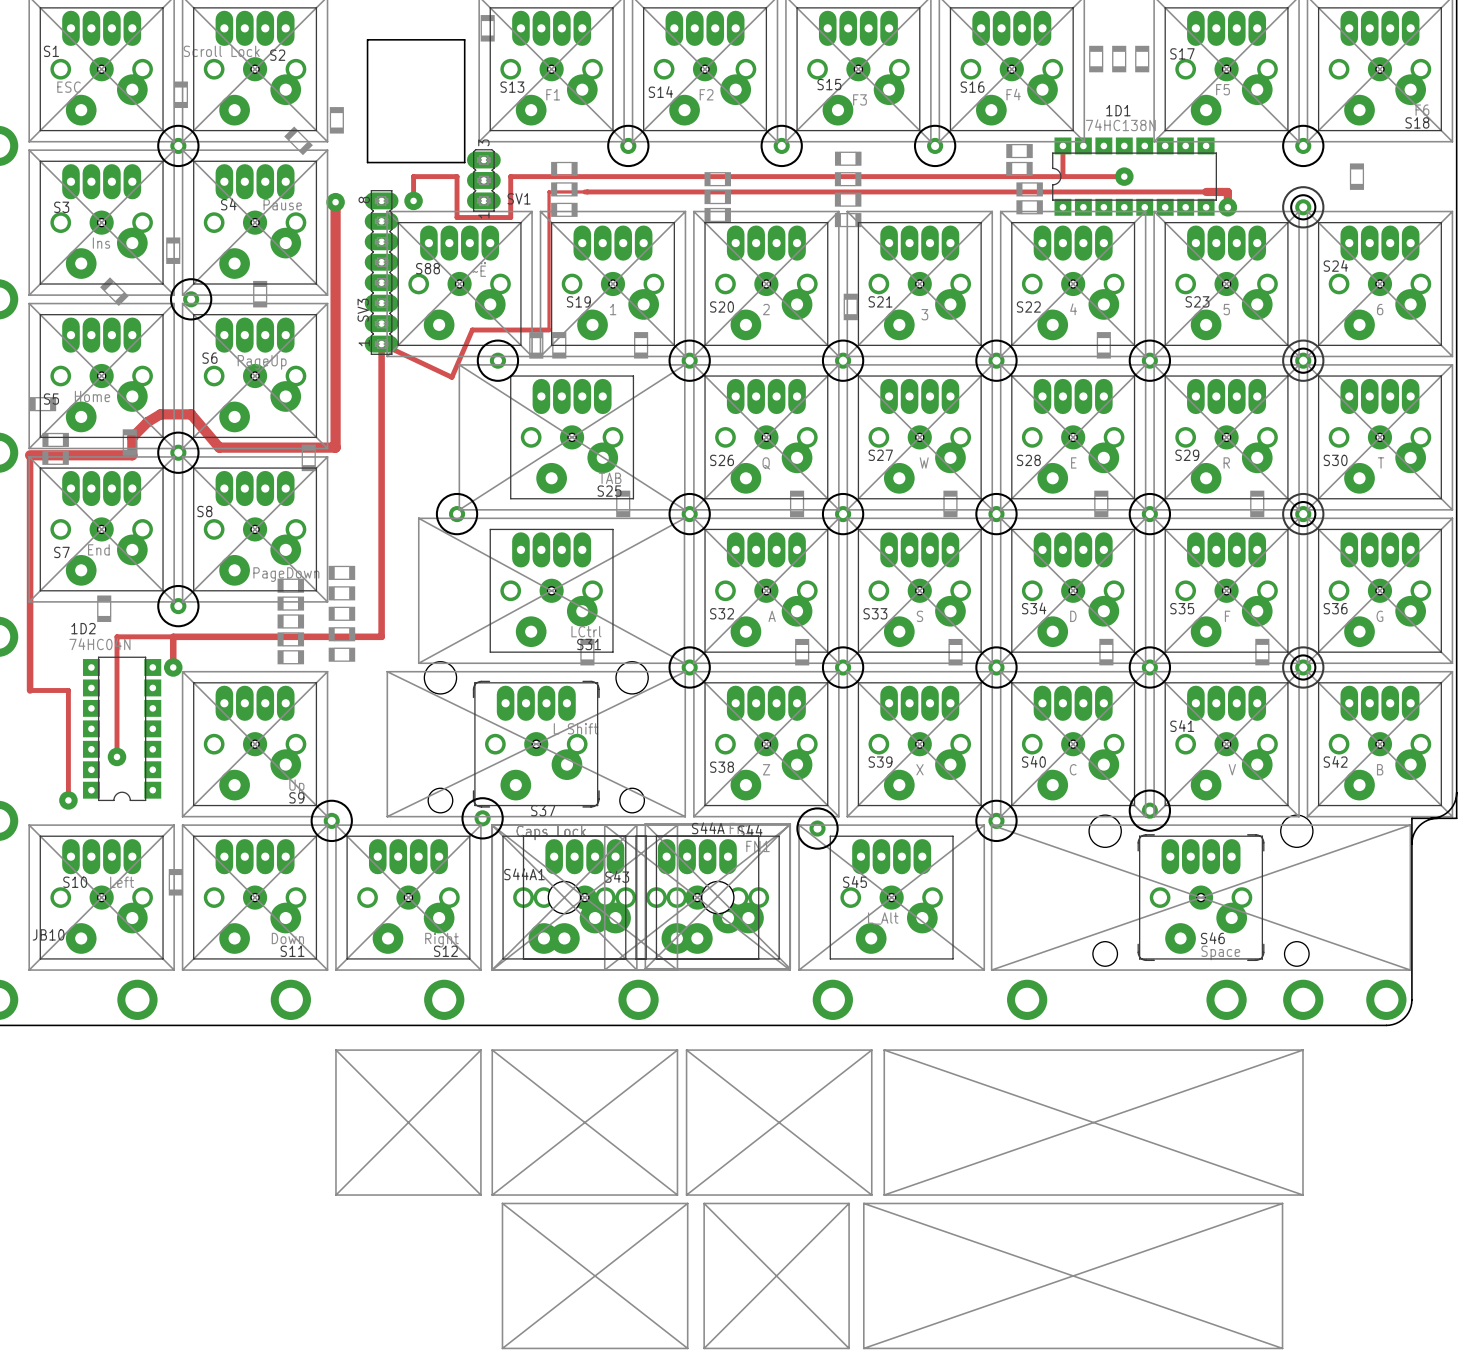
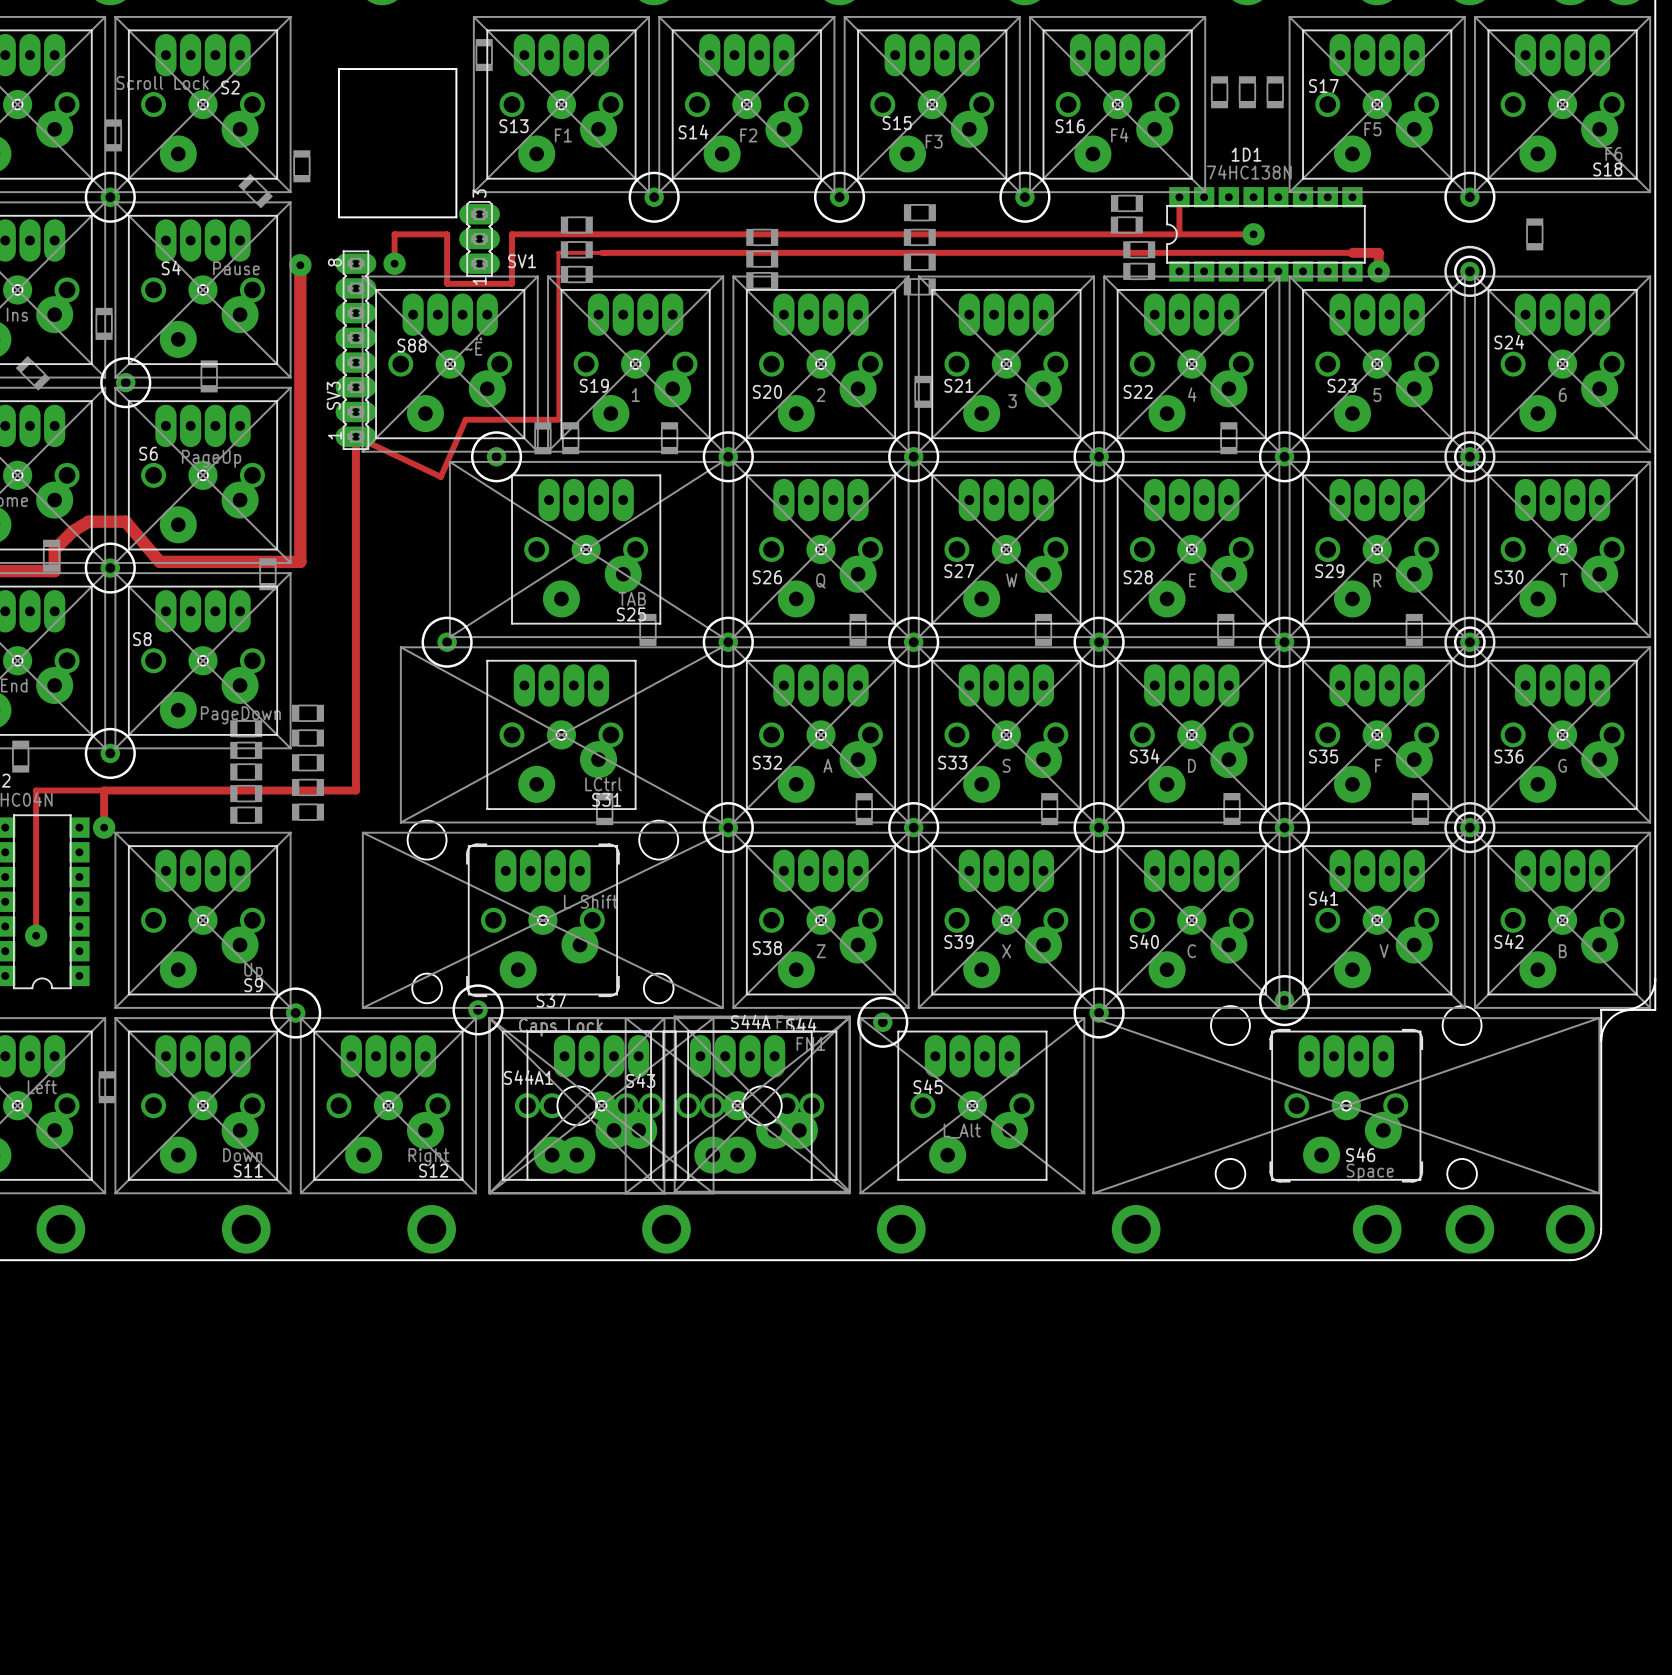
drawing: [335, 1049, 482, 1196] -> none
drawing: [491, 1049, 1304, 1350] -> none

